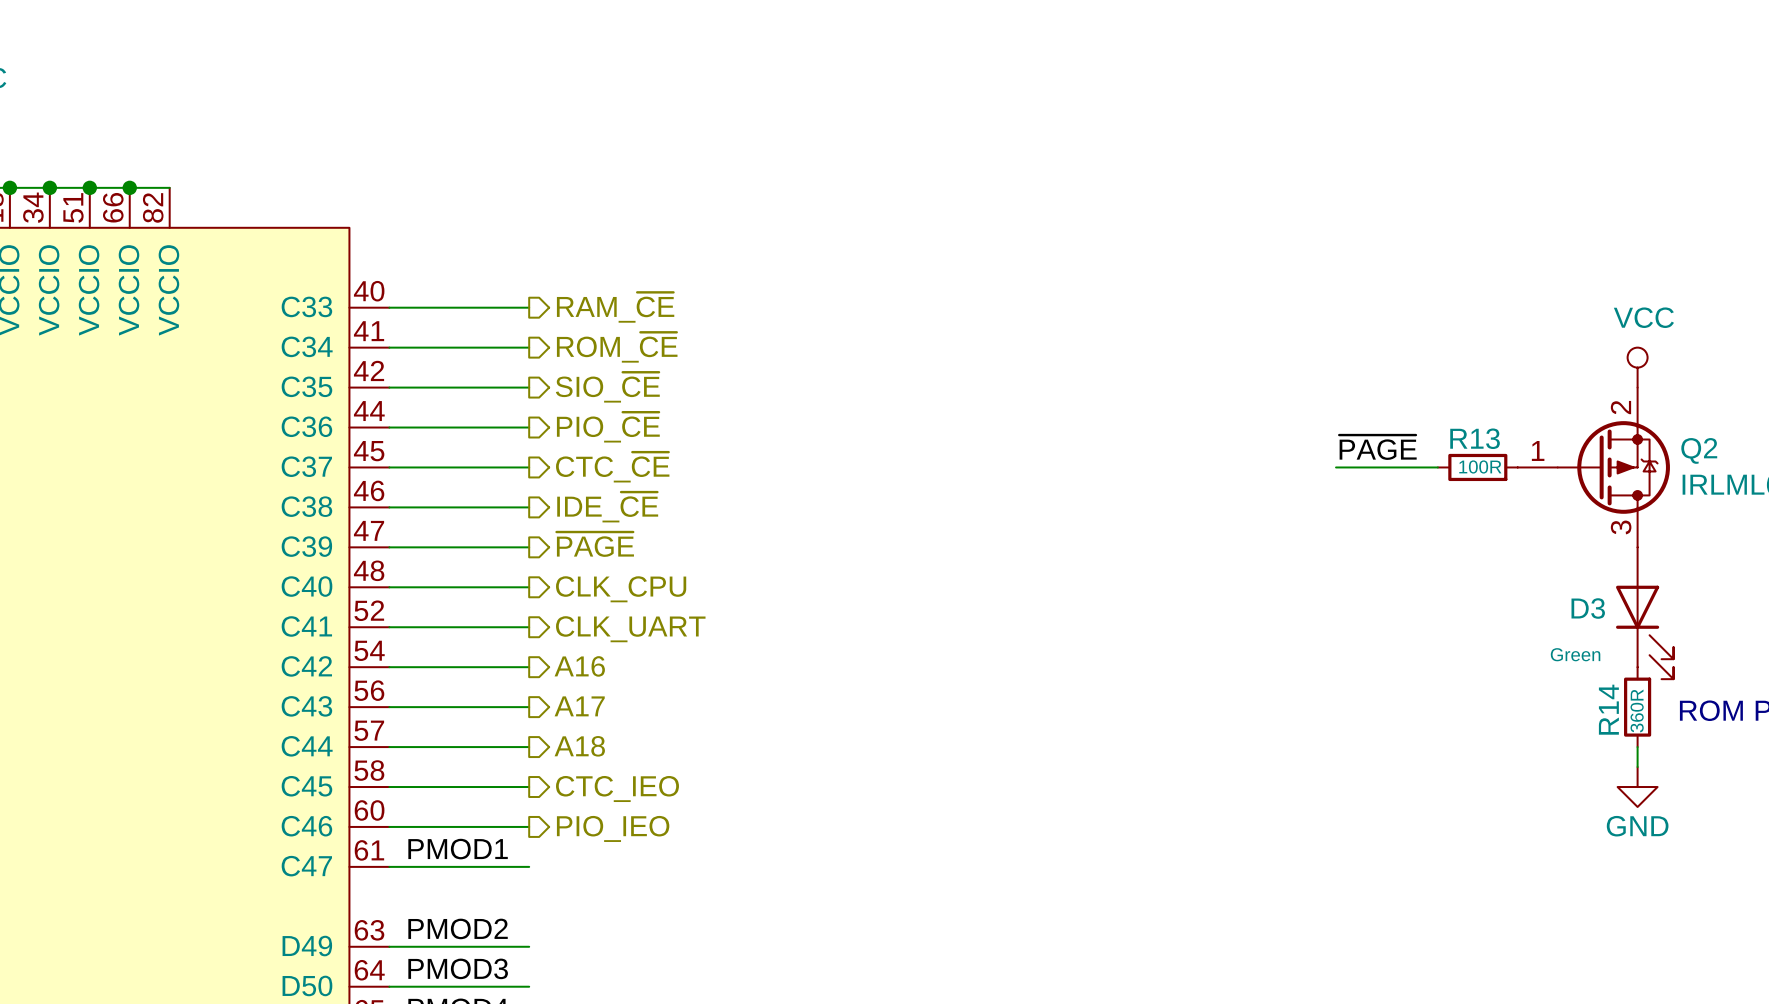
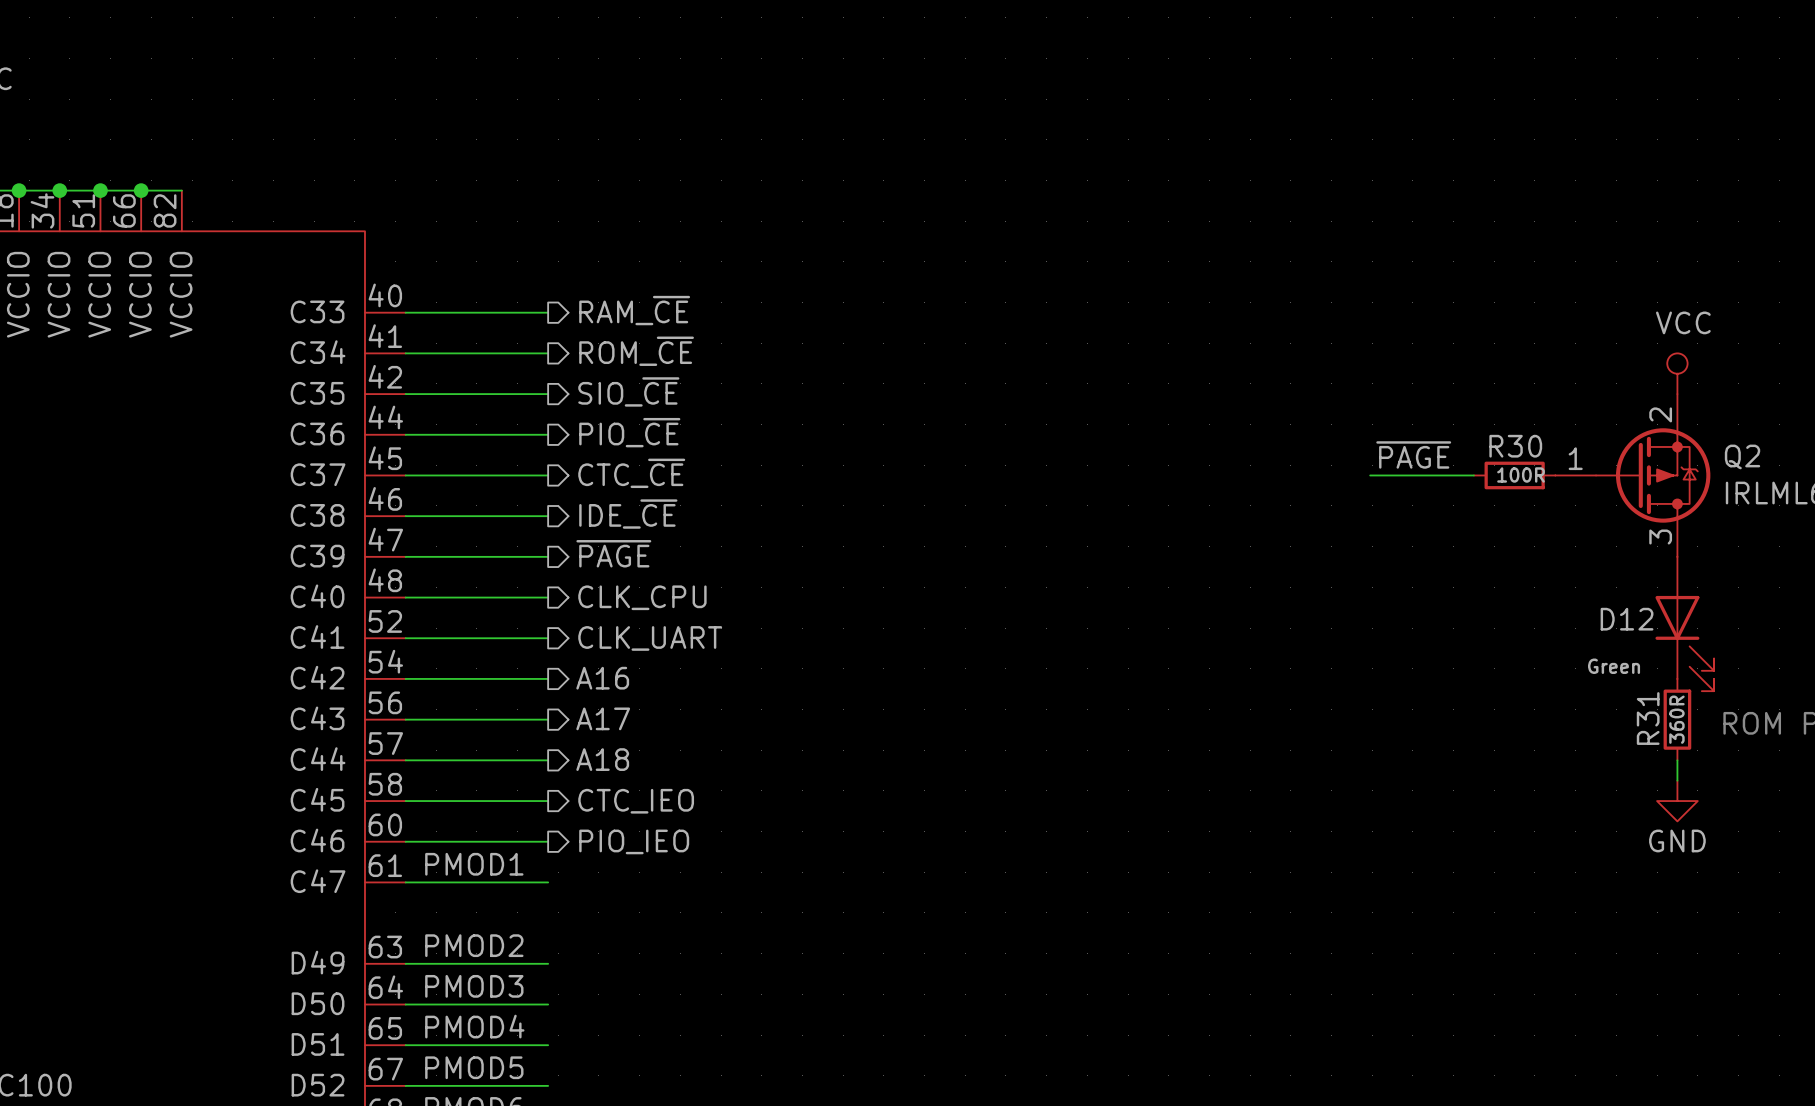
R13 name: R13 (1475, 438) -> R30 (1515, 446)
D3 name: D3 (1588, 608) -> D12 (1627, 619)
R14 name: R14 (1608, 709) -> R31 (1648, 718)

